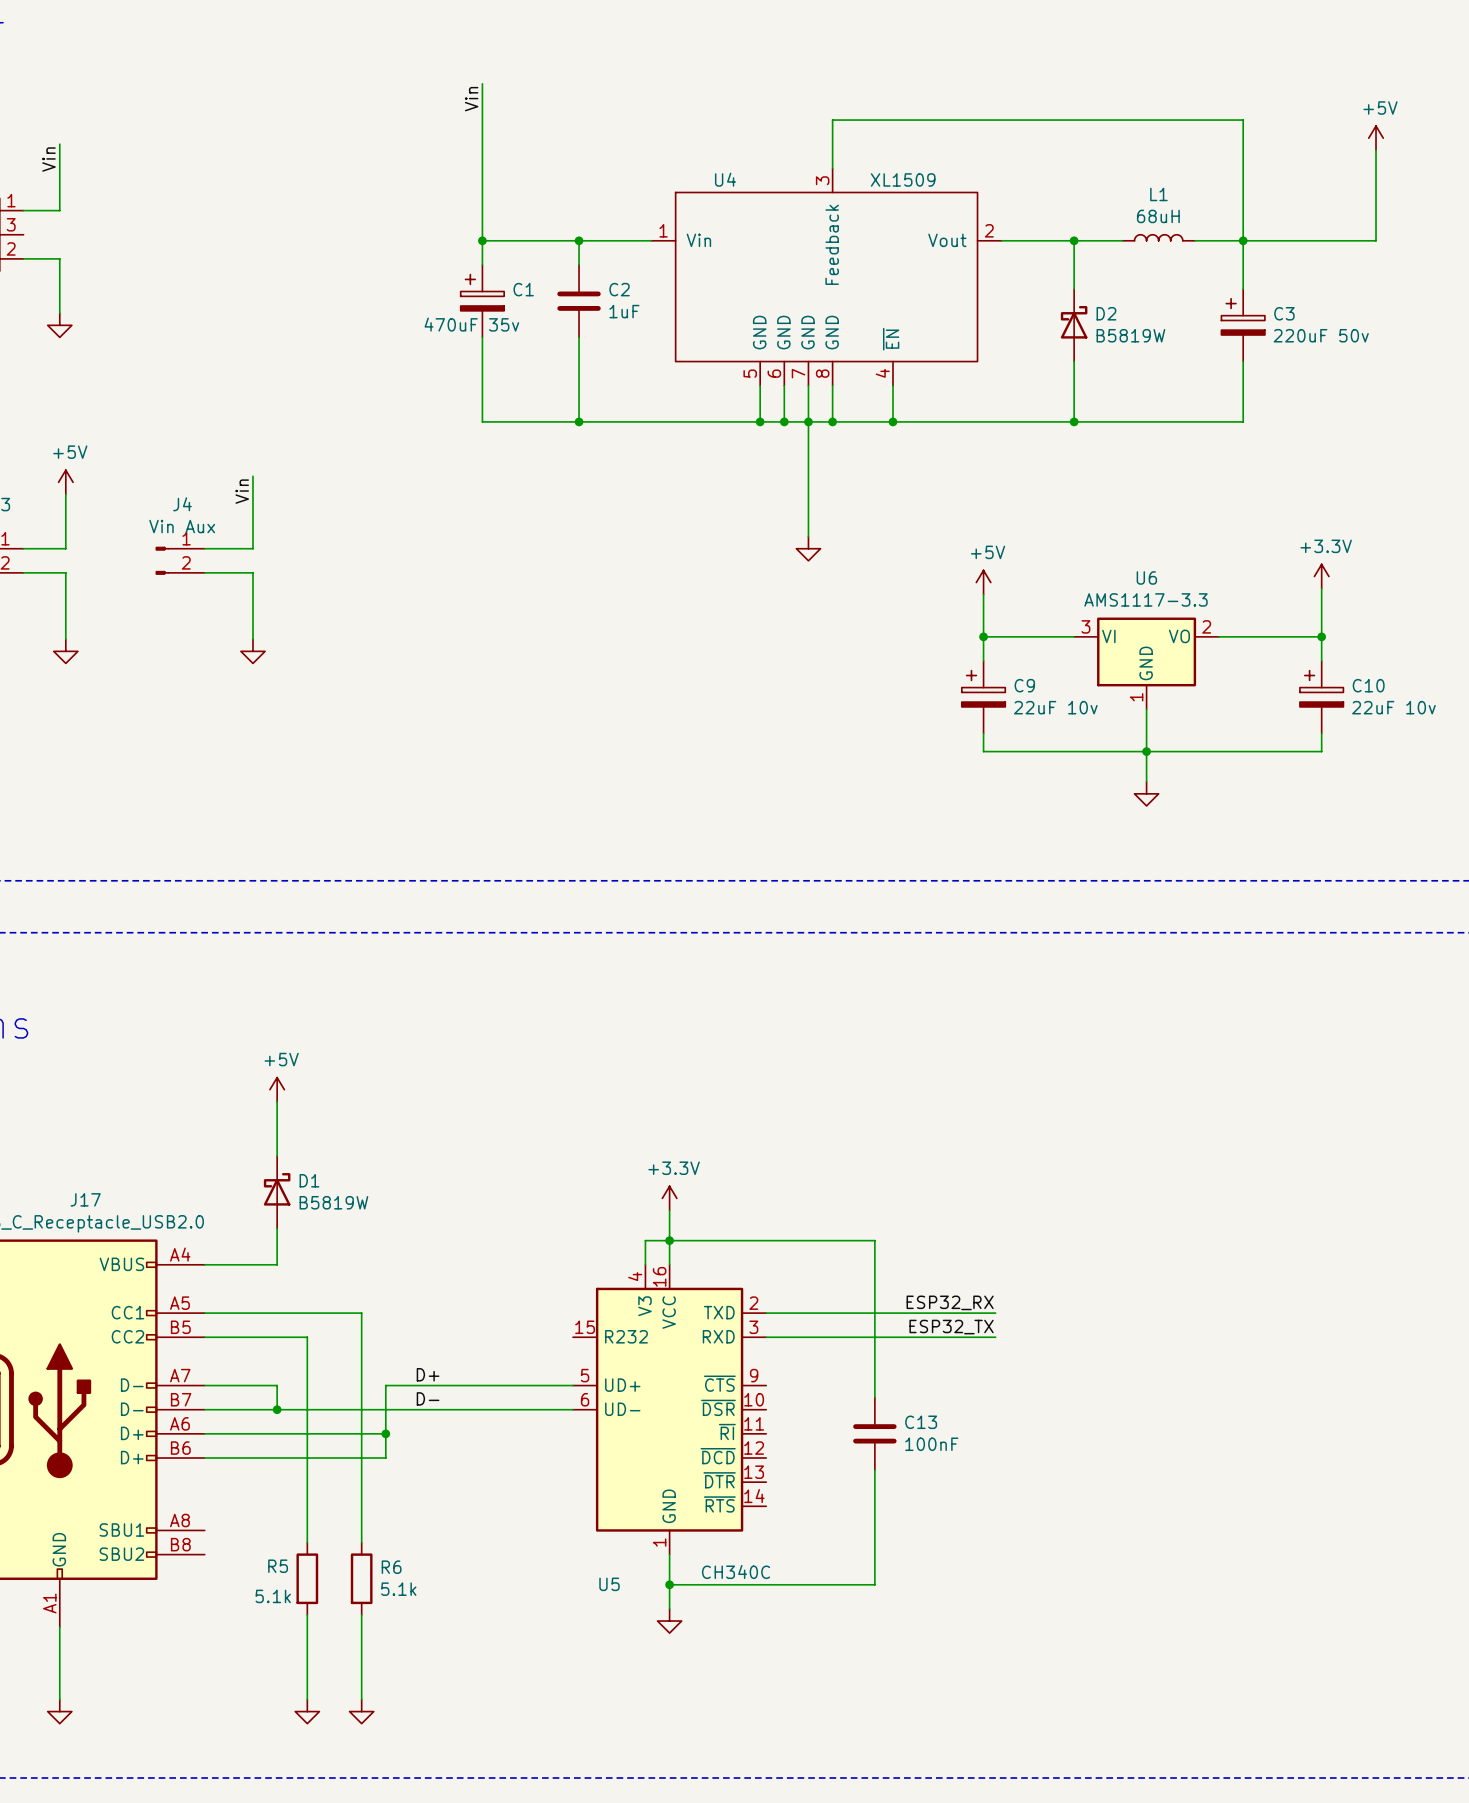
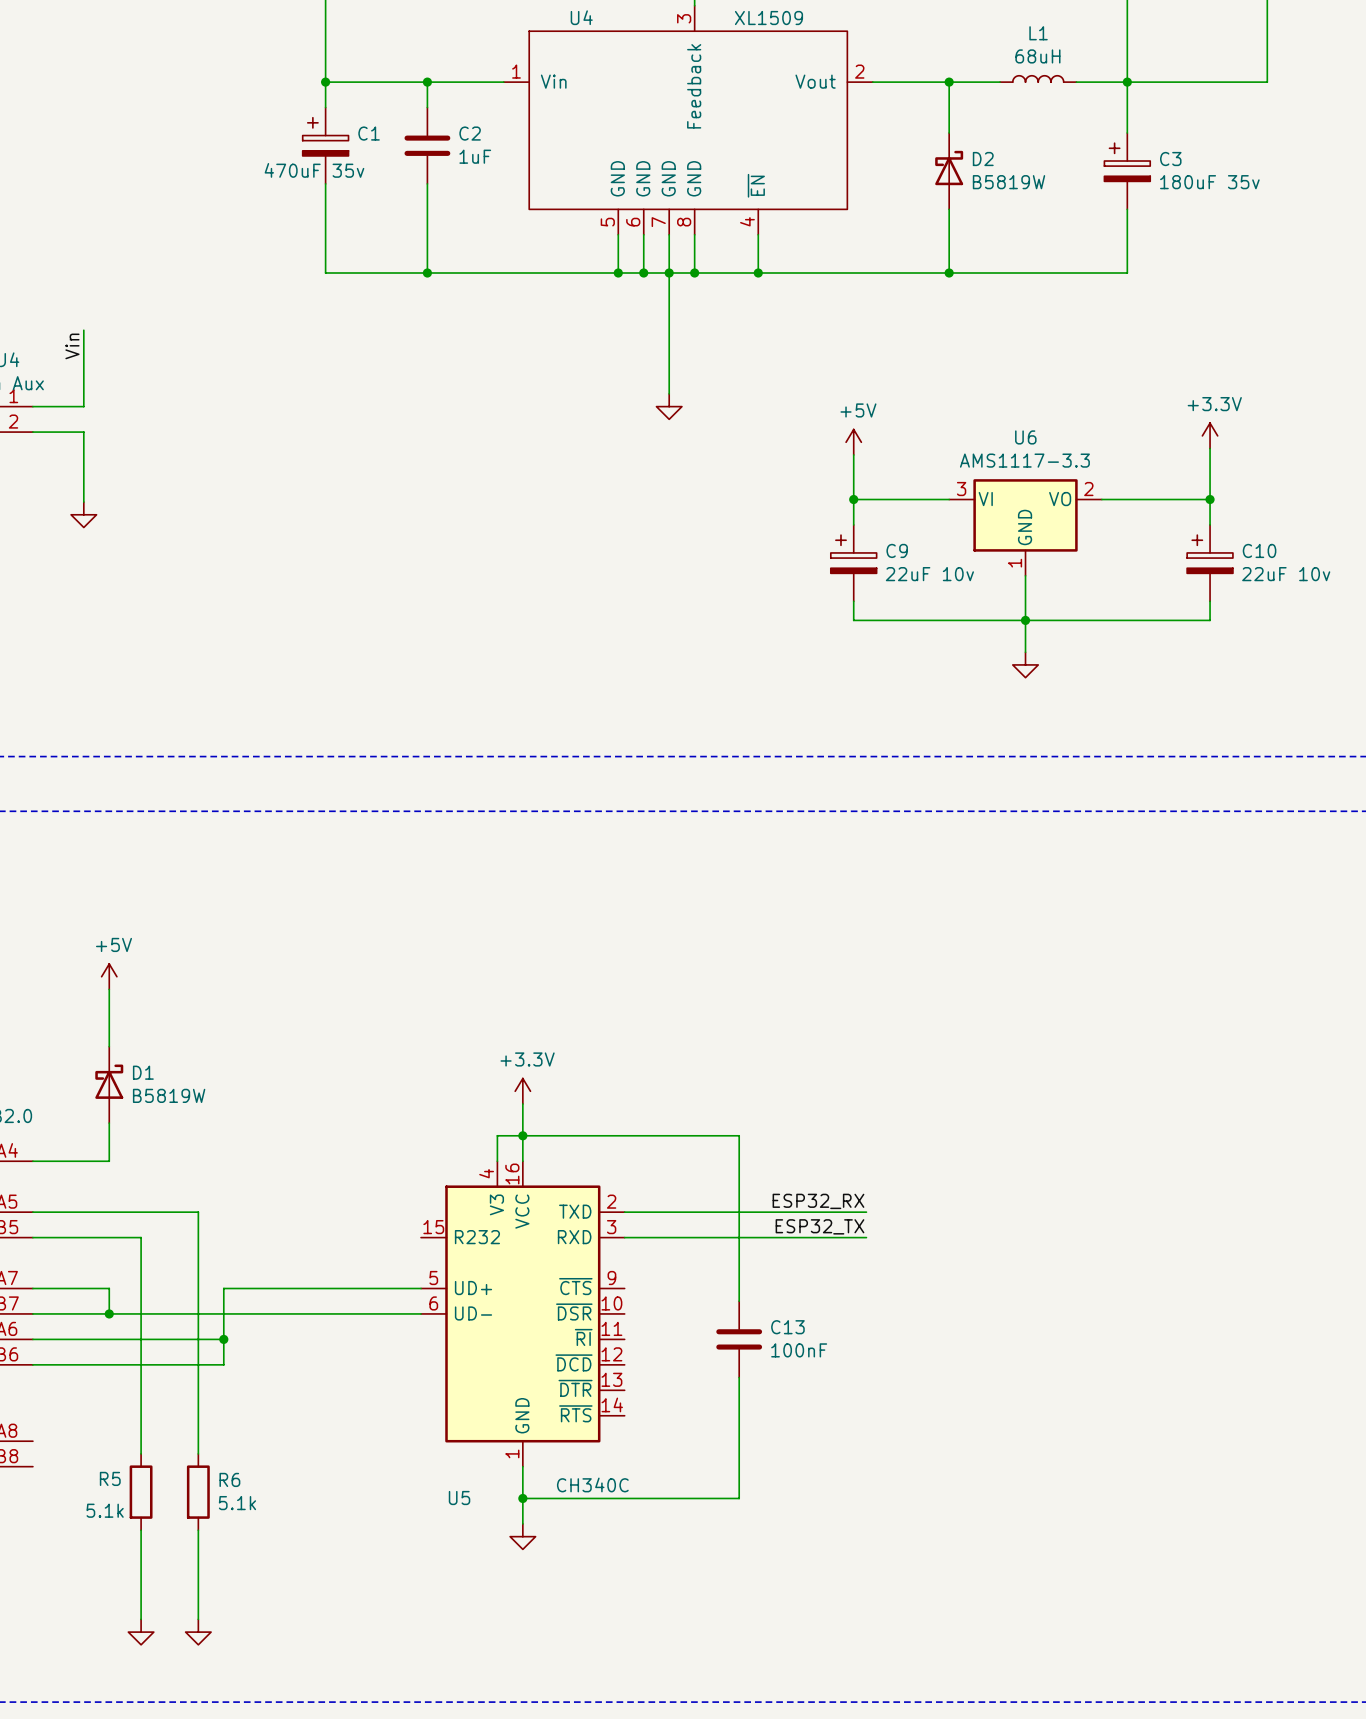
C3 value: 220uF 50v (1321, 335) -> 180uF 35v (1209, 182)
label: D+ (428, 1374) -> none
label: D- (428, 1398) -> none

